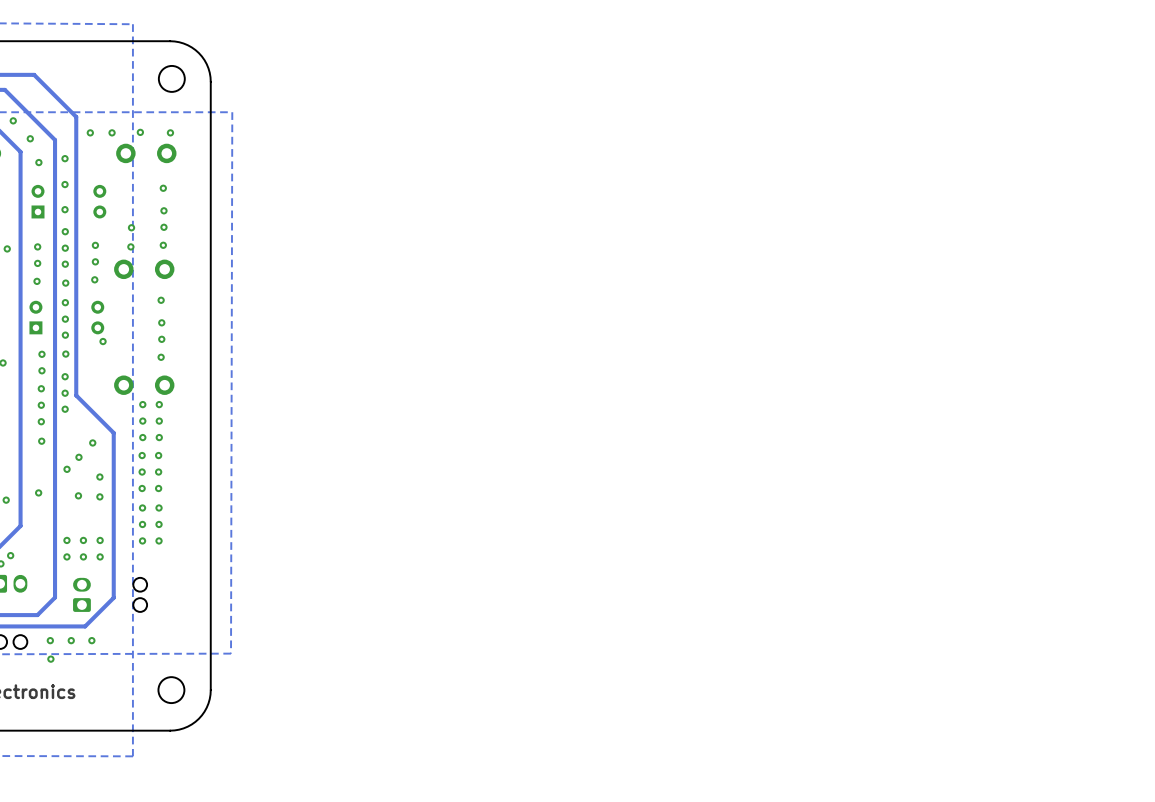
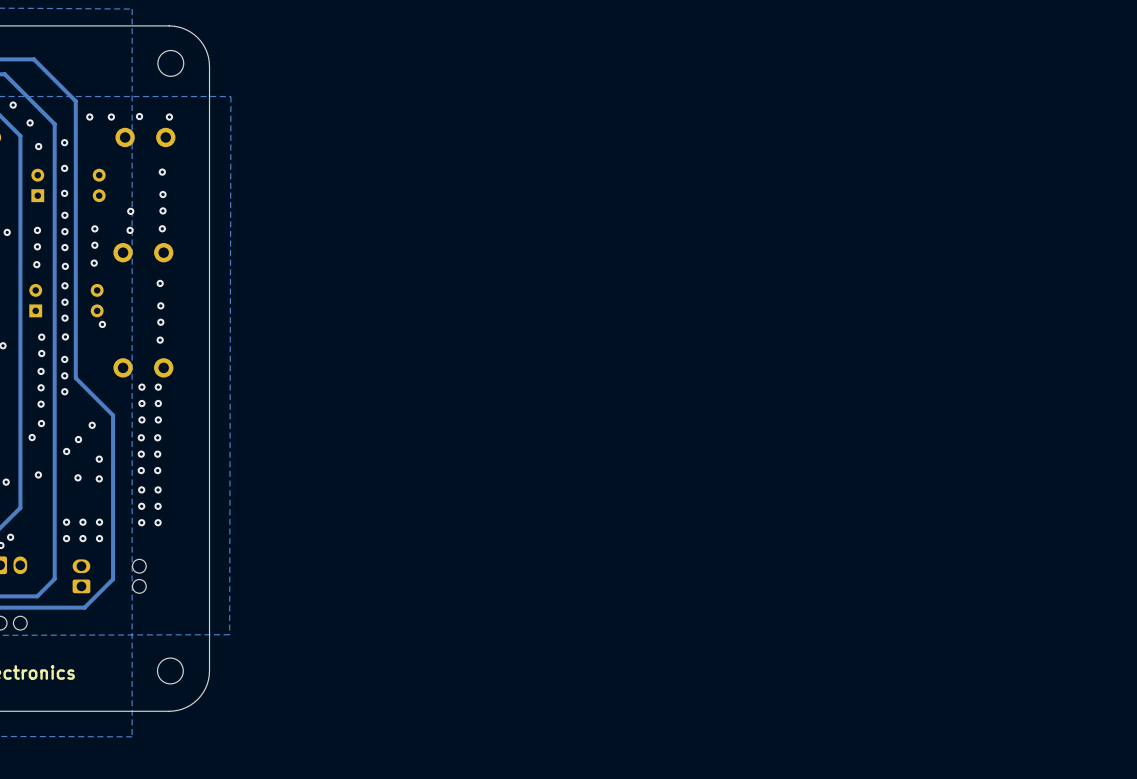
via: none -> (32, 437)
via: (50, 640) -> none
via: (71, 640) -> none
via: (91, 640) -> none
via: (50, 659) -> none

